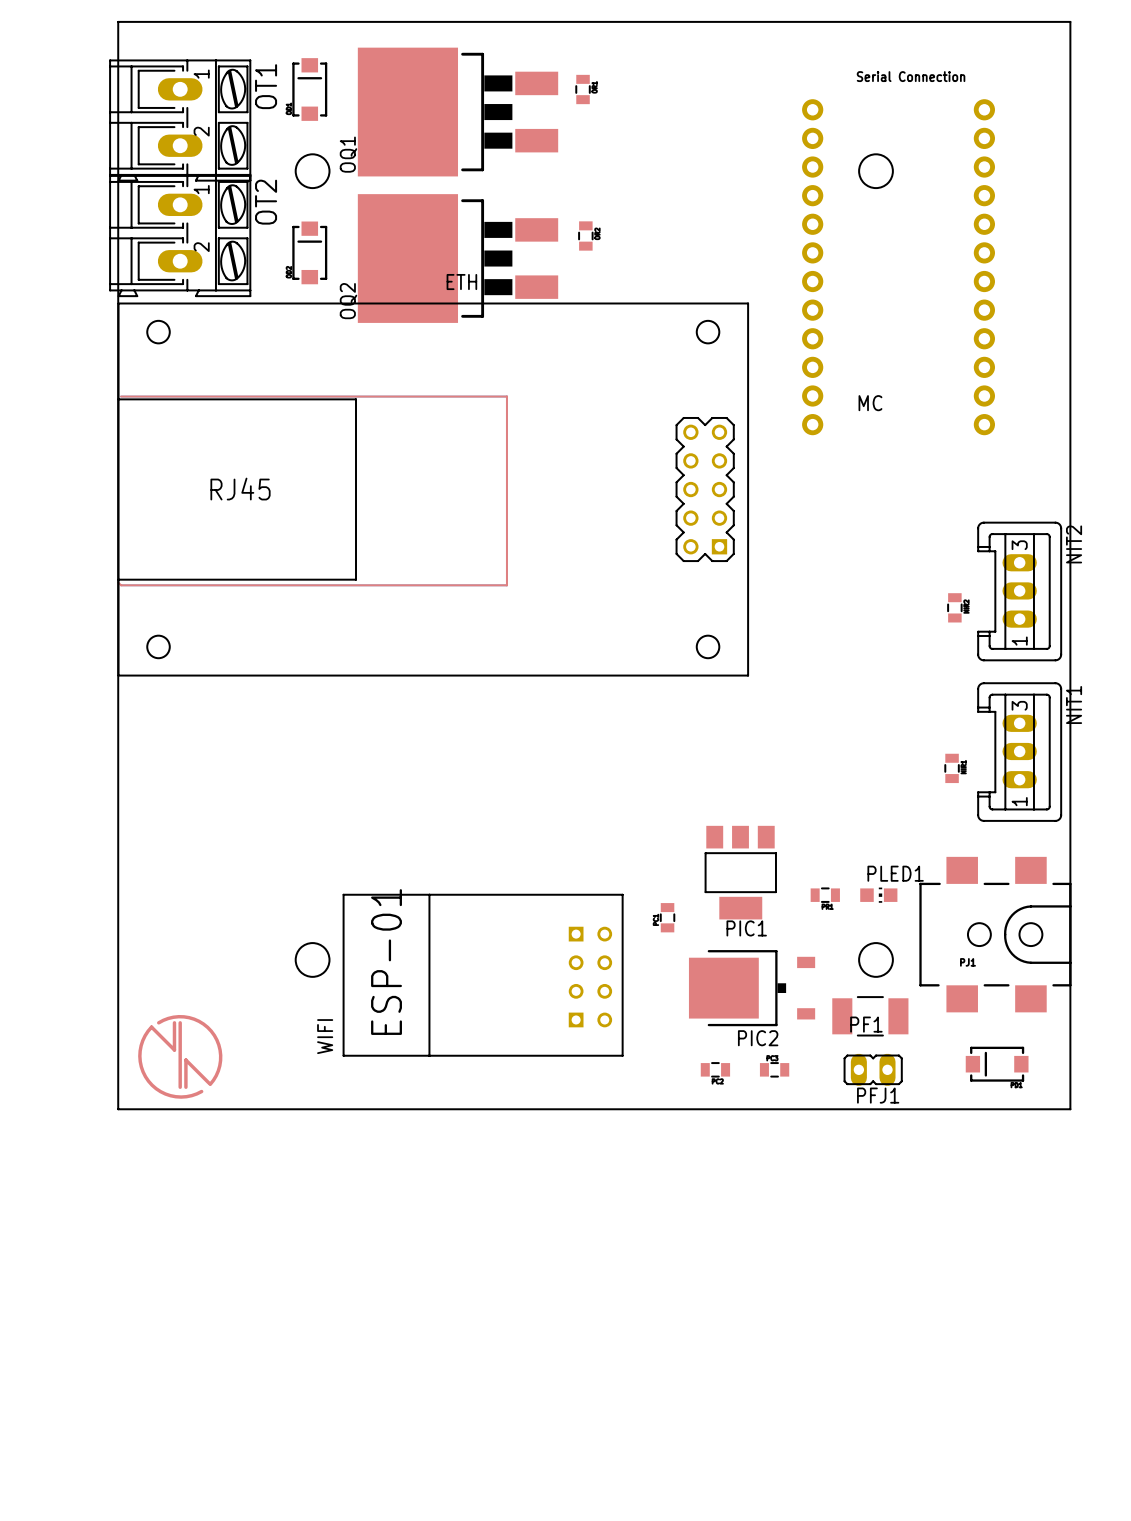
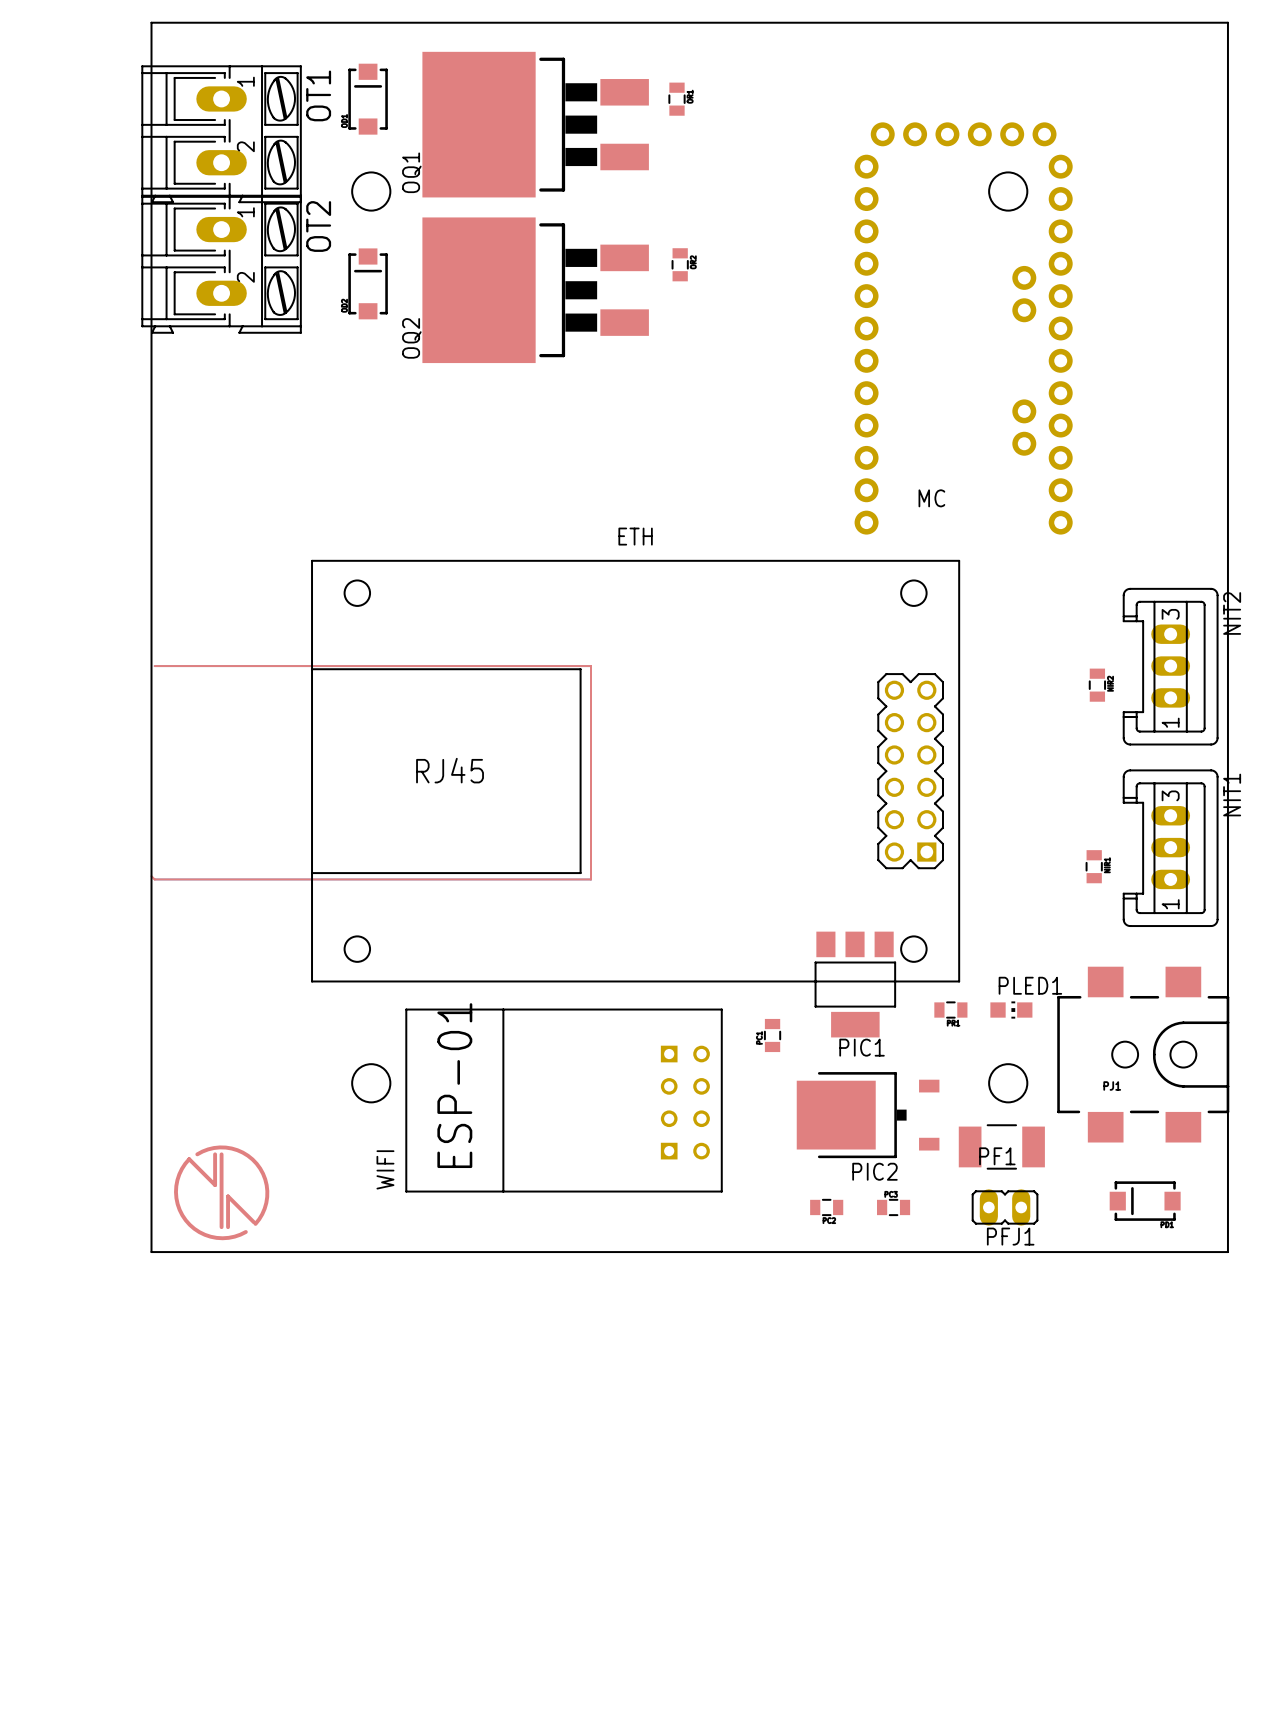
MC: (898, 267) -> none
MC: none -> (963, 328)
top track: (121, 396) (506, 396) (506, 585) (121, 585) (118, 582) -> (154, 666) (591, 666) (591, 879) (154, 879) (151, 876)
ETH: (433, 489) -> none
ETH: none -> (635, 771)

